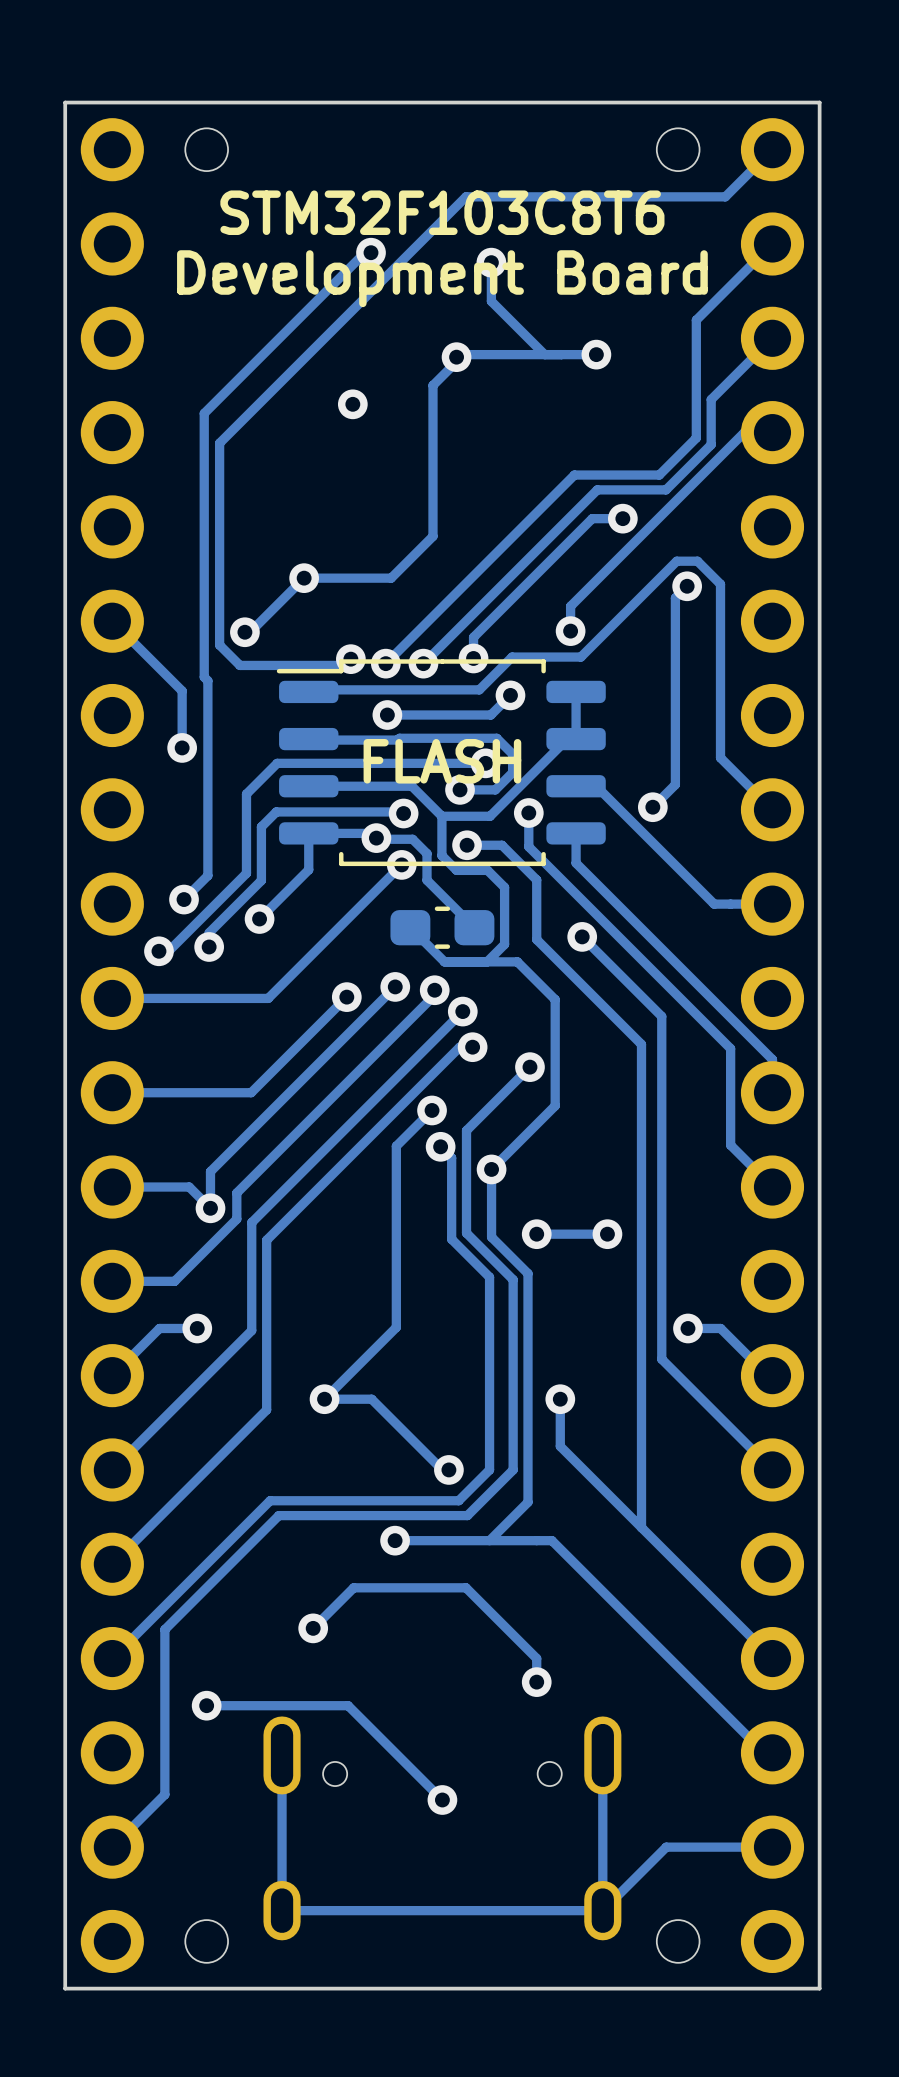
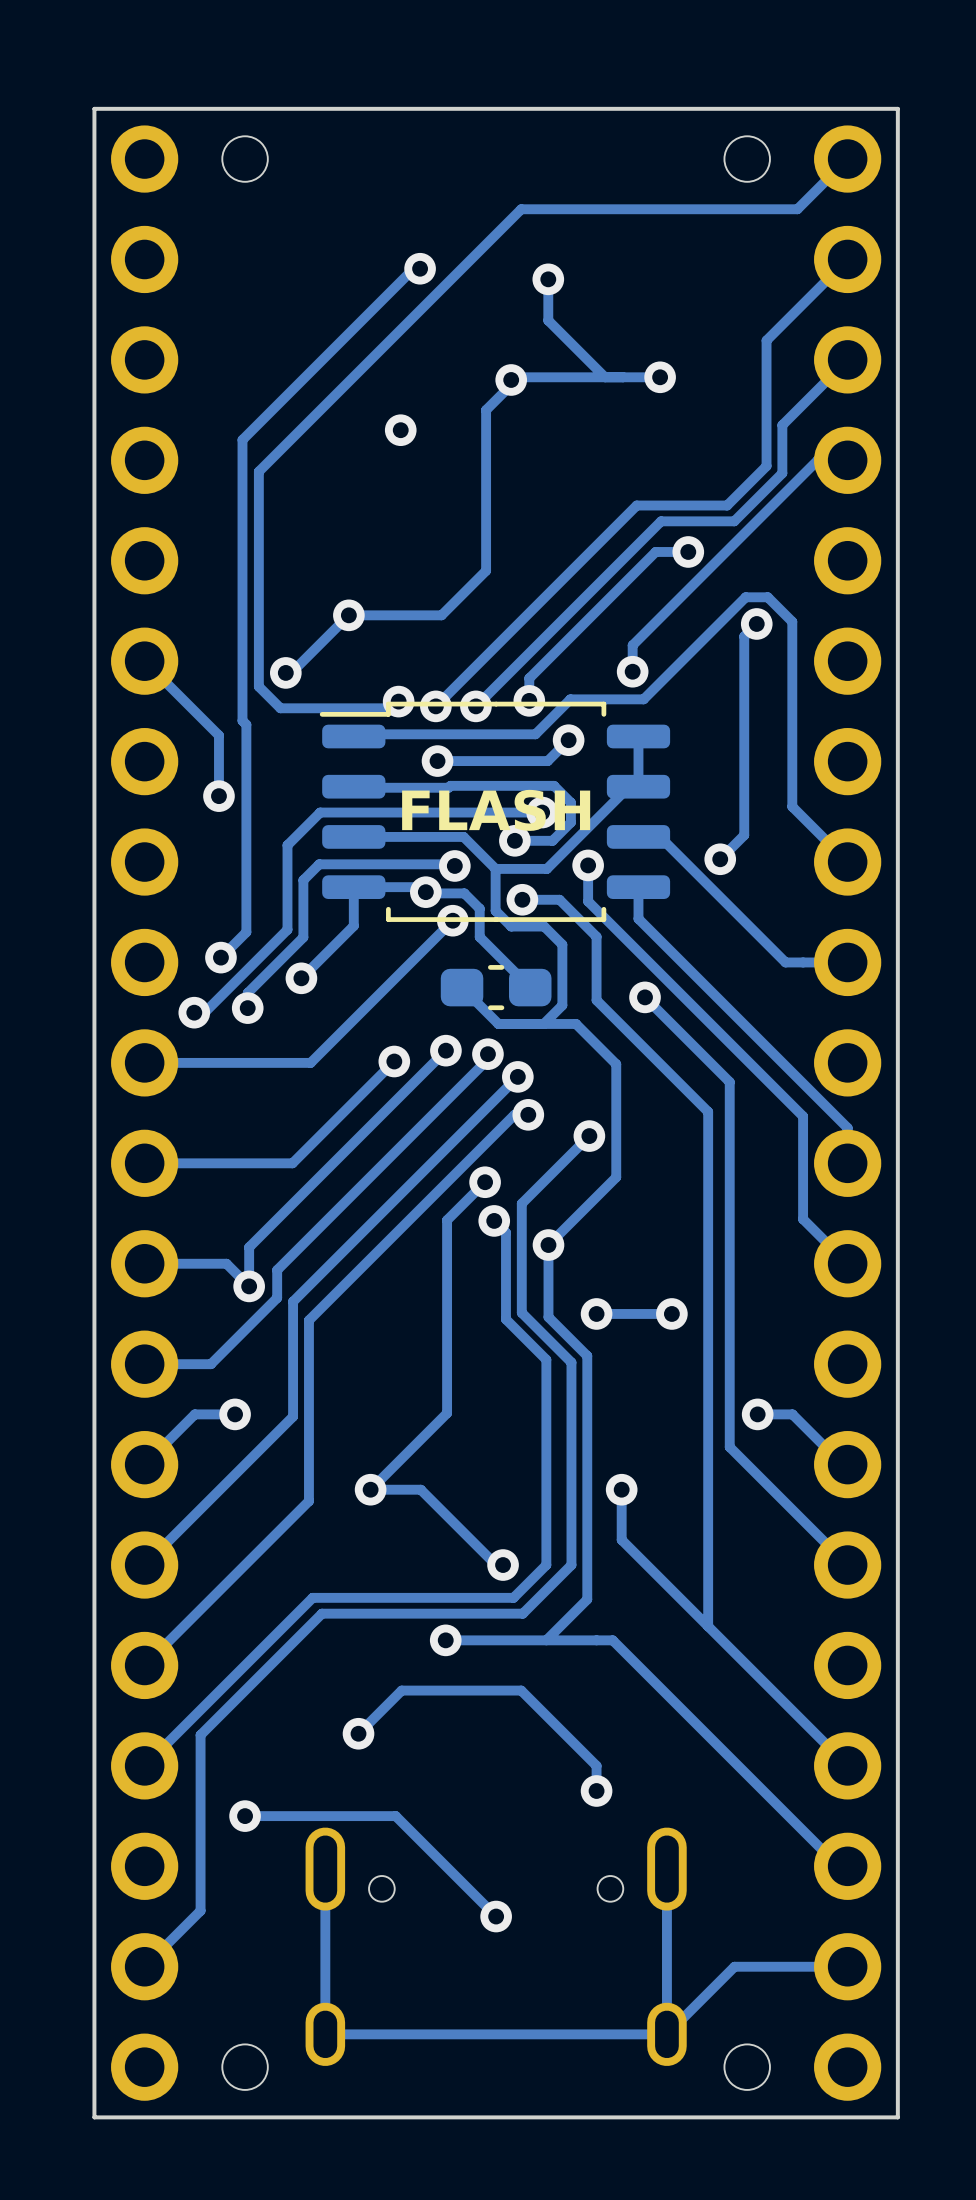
text: STM32F103C8T6 (442, 212) -> none
text: Development Board (442, 278) -> none

